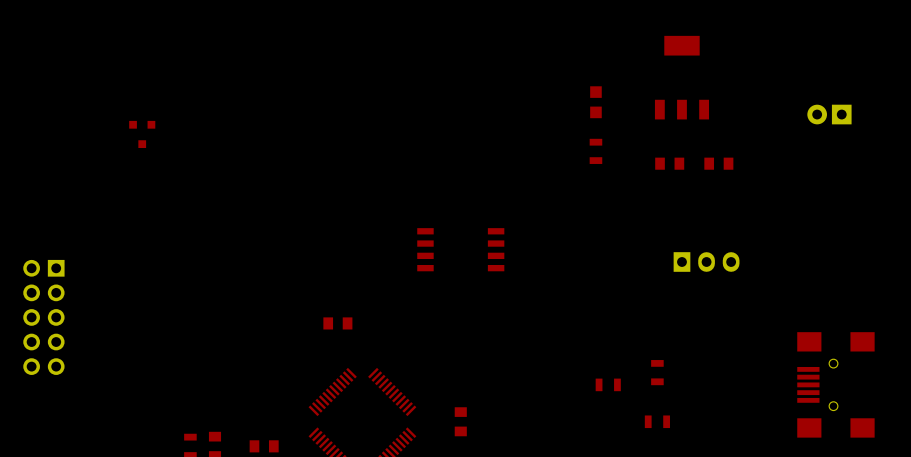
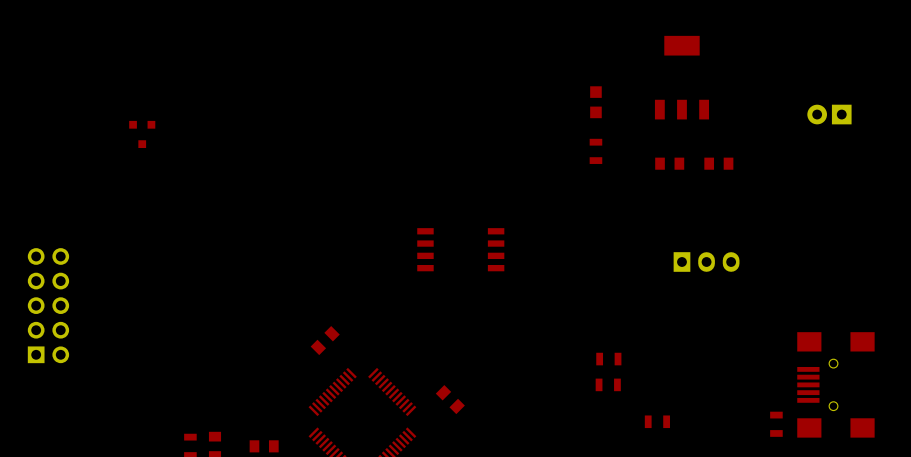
part rotation: 0° (43, 317) -> 180° (48, 305)
part: (337, 323) -> none
part: none -> (325, 340)
part rotation: 0° (657, 372) -> 90° clockwise (608, 359)
part position: (657, 372) -> (608, 359)
part: none -> (450, 399)
part: (460, 421) -> none
part: none -> (776, 424)

